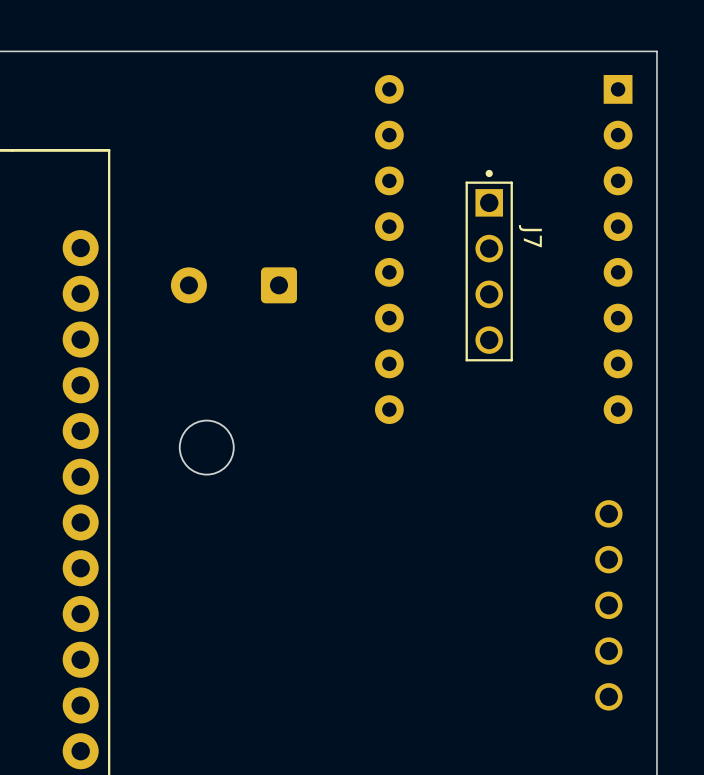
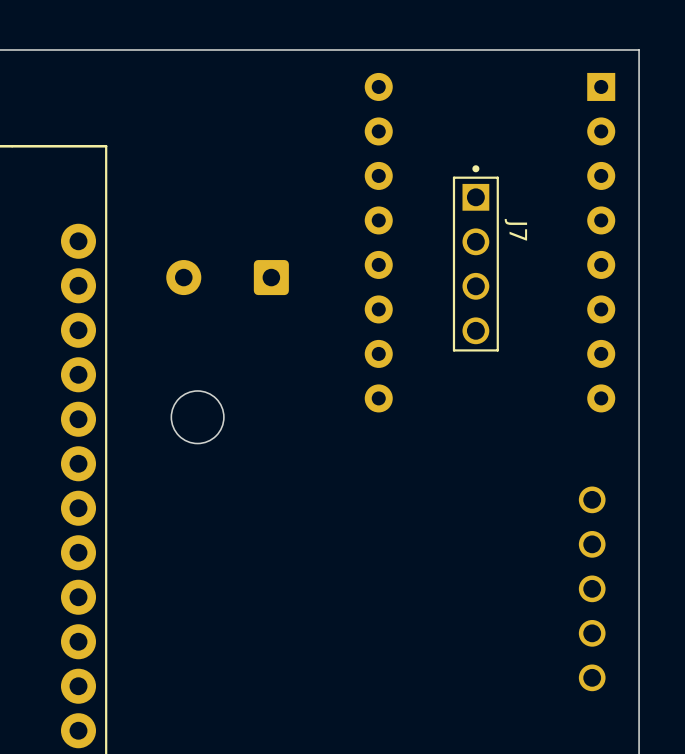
round board edge: none -> [170, 390, 225, 444]
round board edge: [178, 419, 235, 476] -> none

